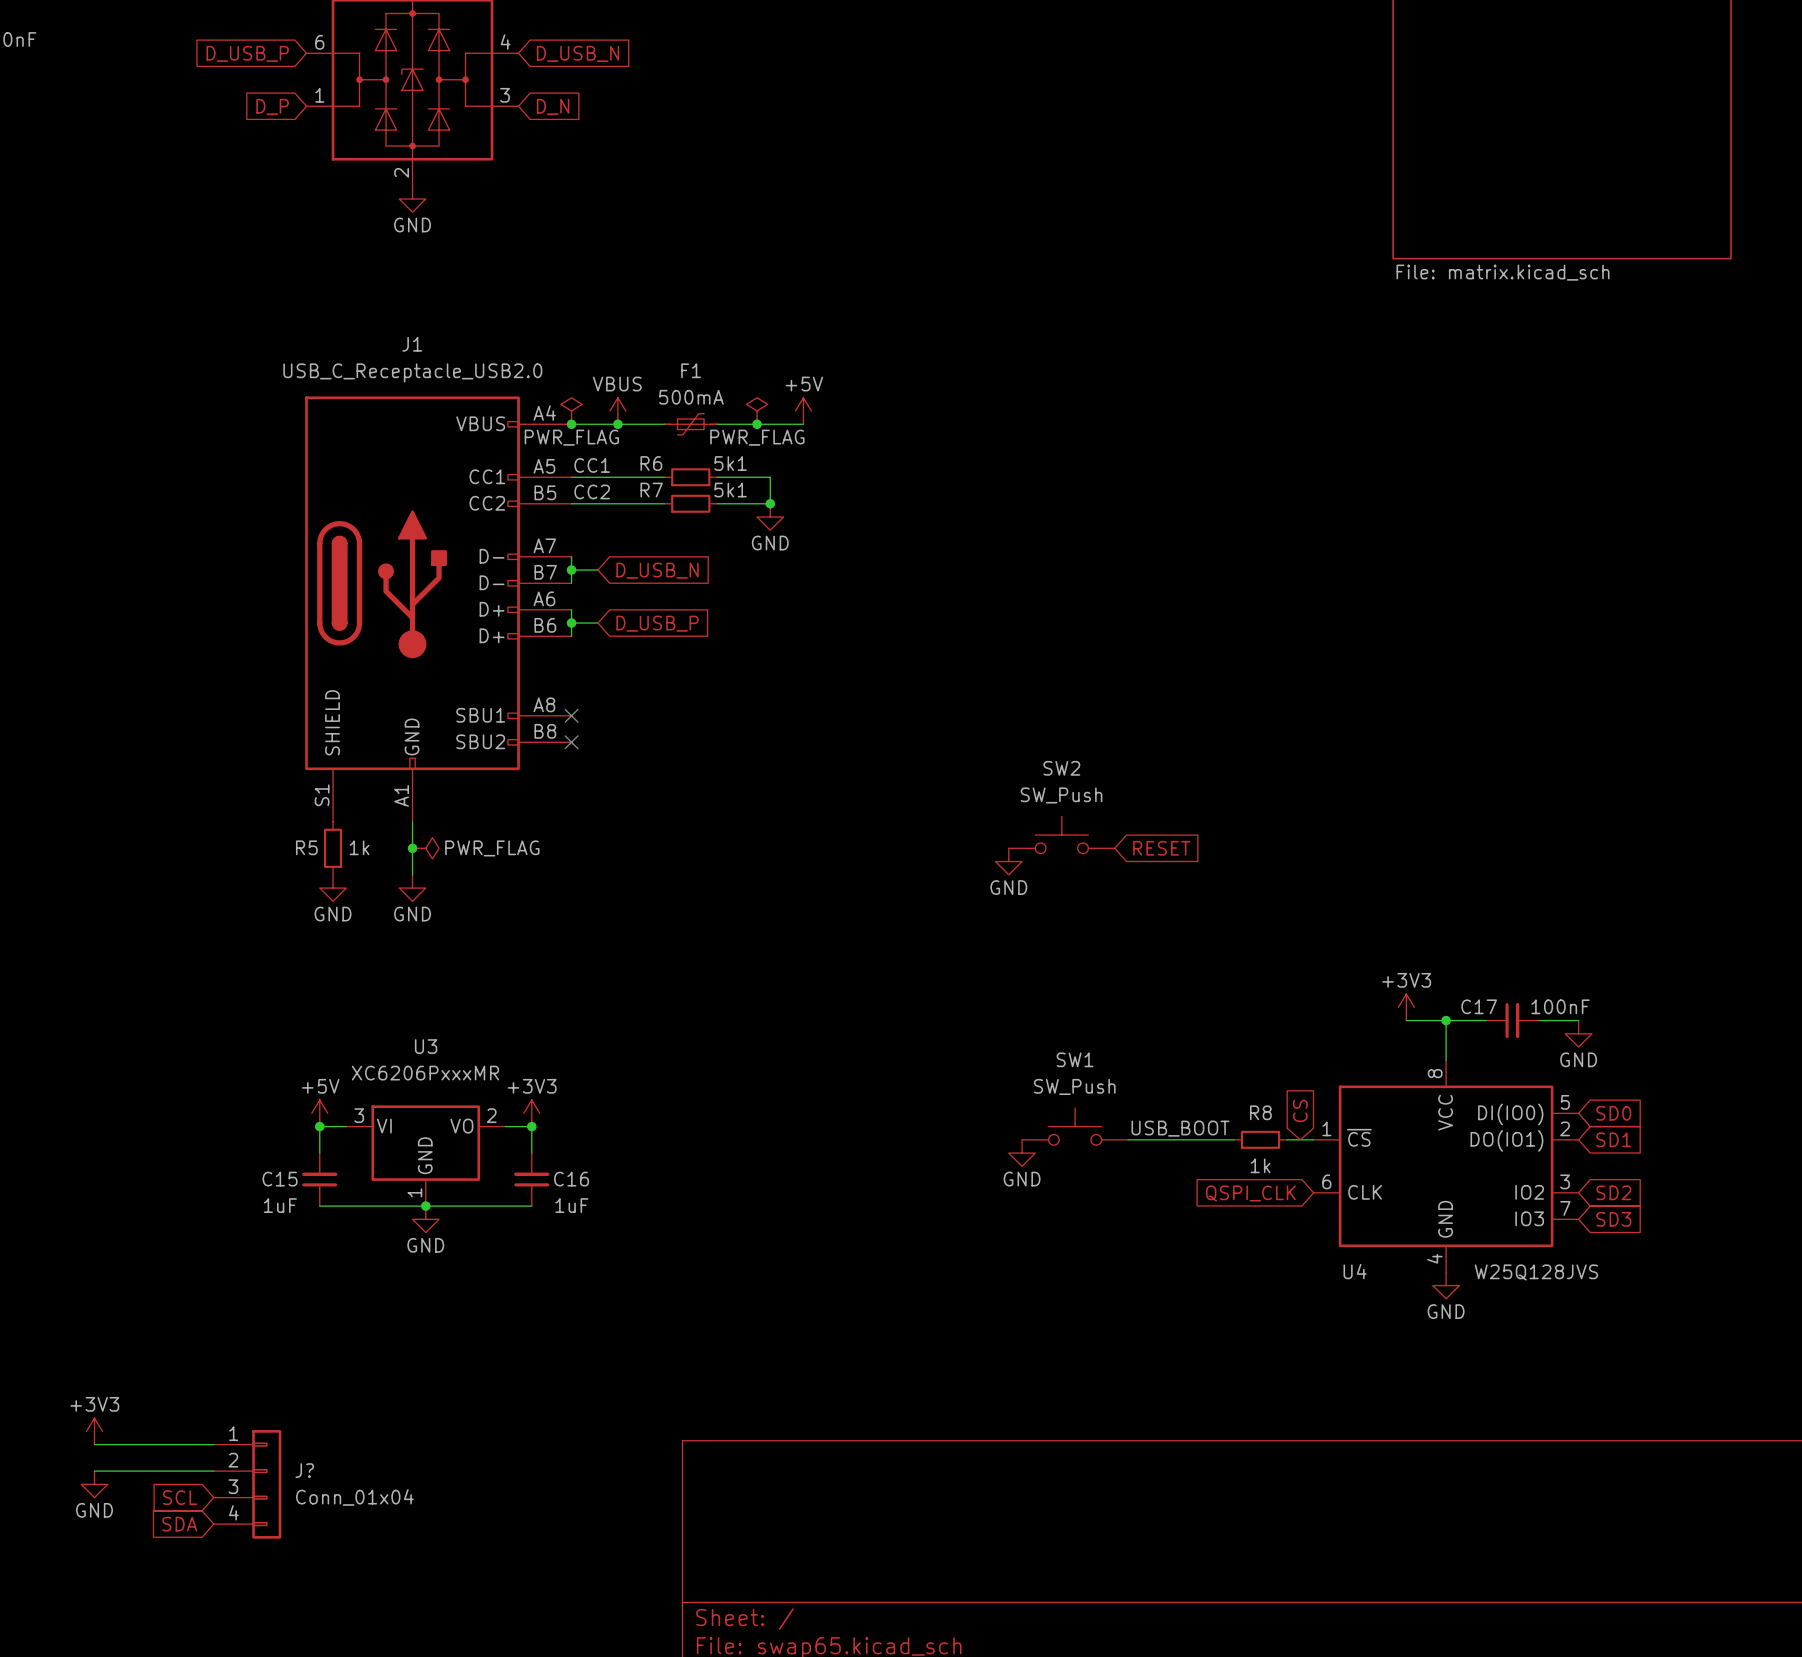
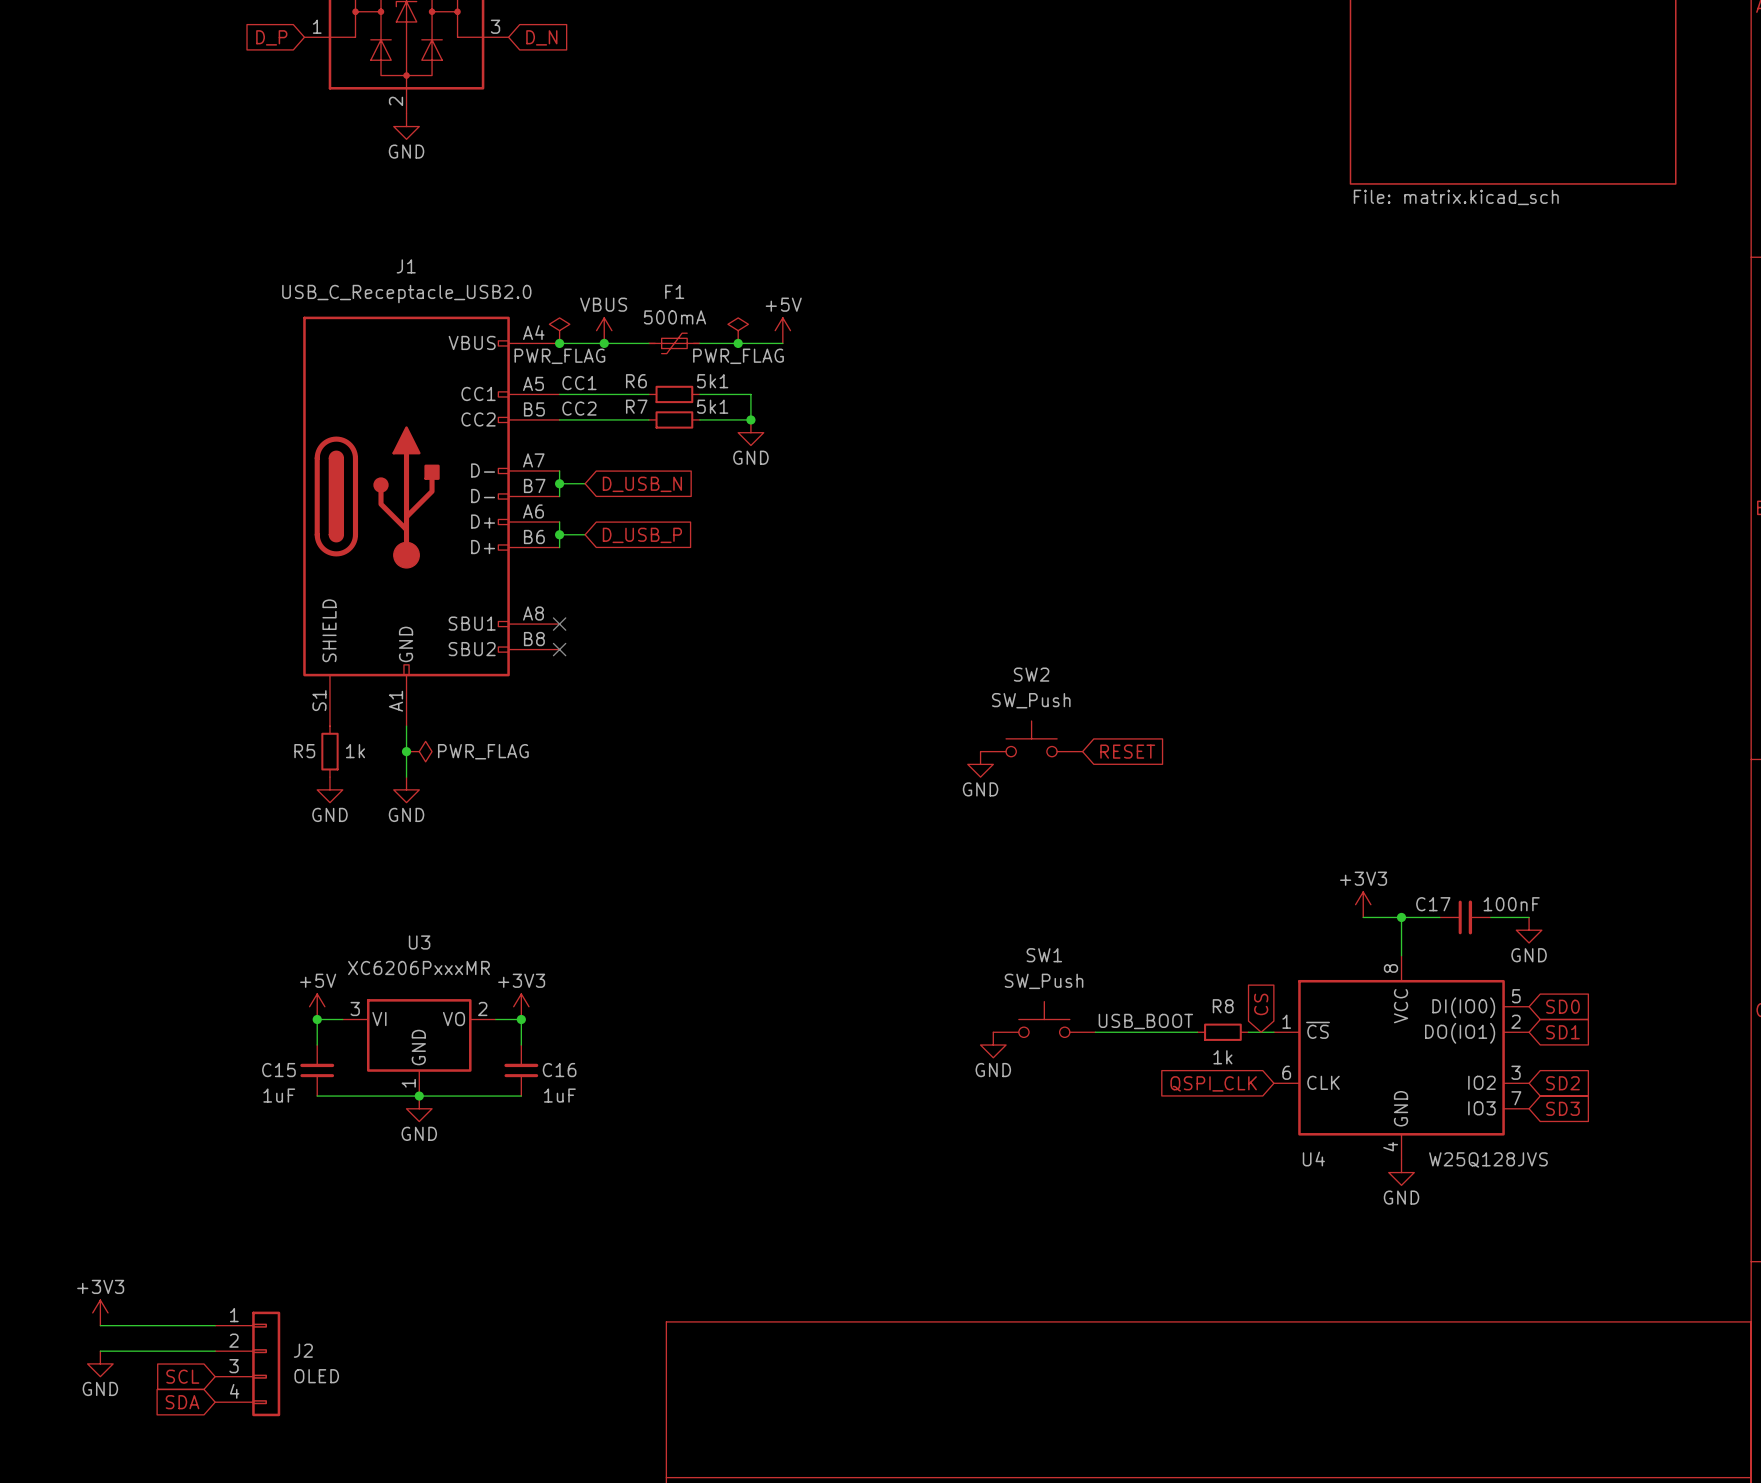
J? name: J? (304, 1470) -> J2 (303, 1350)
J? value: Conn_01x04 (354, 1497) -> OLED (316, 1376)

